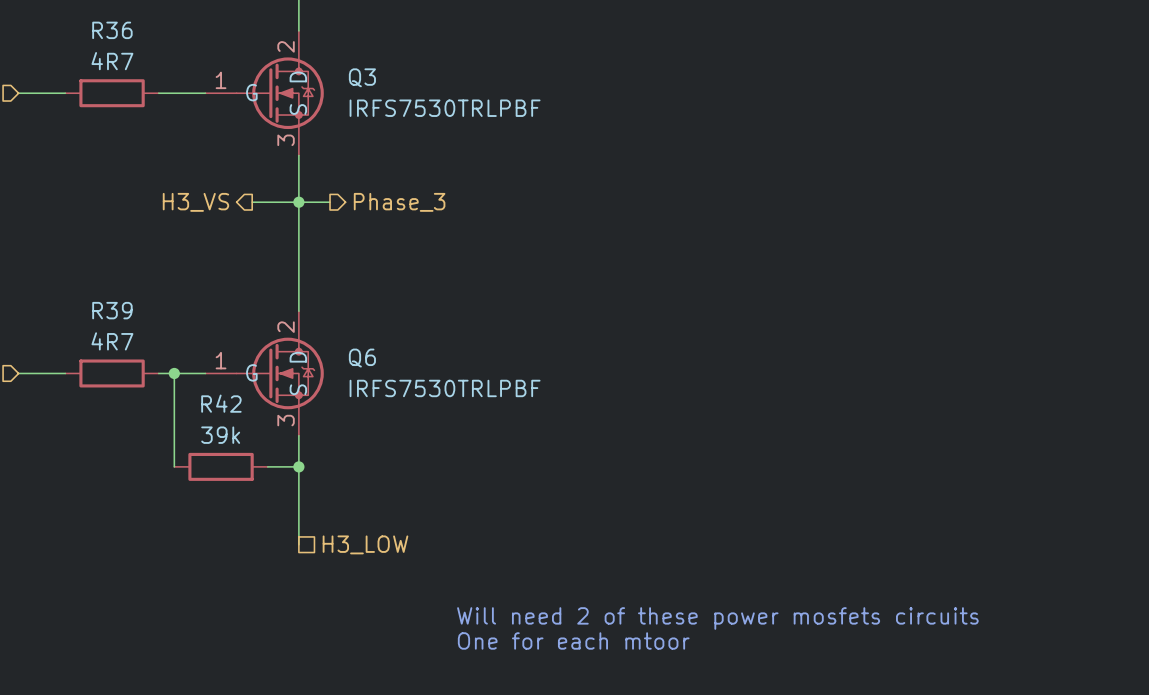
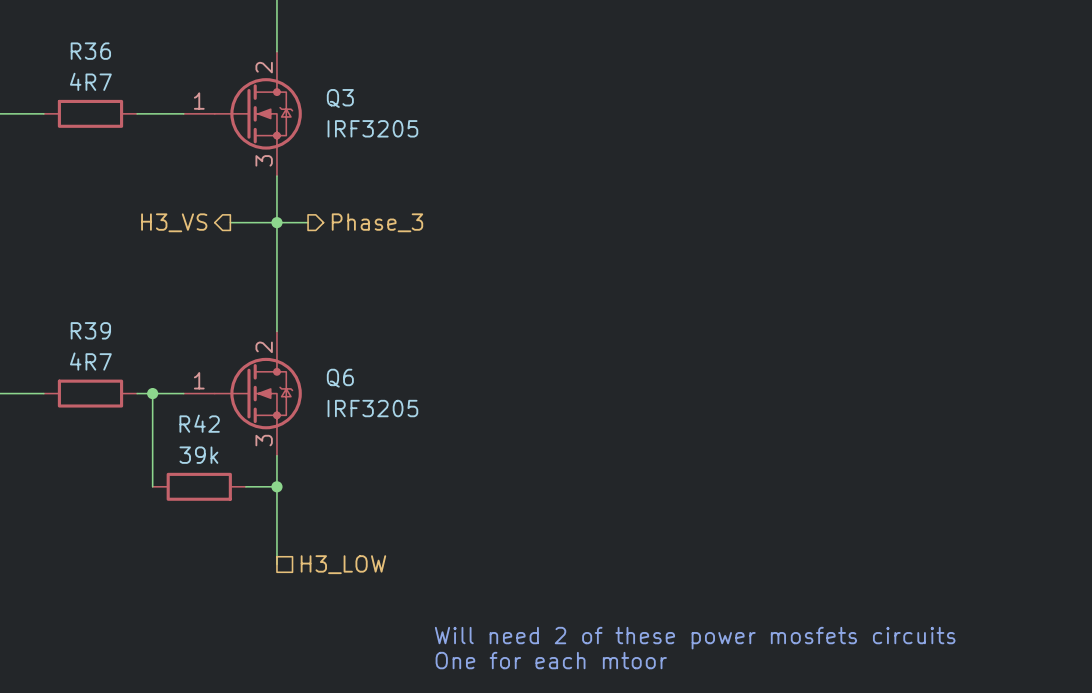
Q3 pin name: D (298, 76) -> none
Q3 pin name: G (251, 92) -> none
Q3 value: IRFS7530TRLPBF (445, 108) -> IRF3205 (372, 128)
Q3 pin name: S (298, 109) -> none
Q6 pin name: D (298, 357) -> none
Q6 pin name: G (251, 372) -> none
Q6 value: IRFS7530TRLPBF (445, 388) -> IRF3205 (372, 408)
Q6 pin name: S (298, 389) -> none

